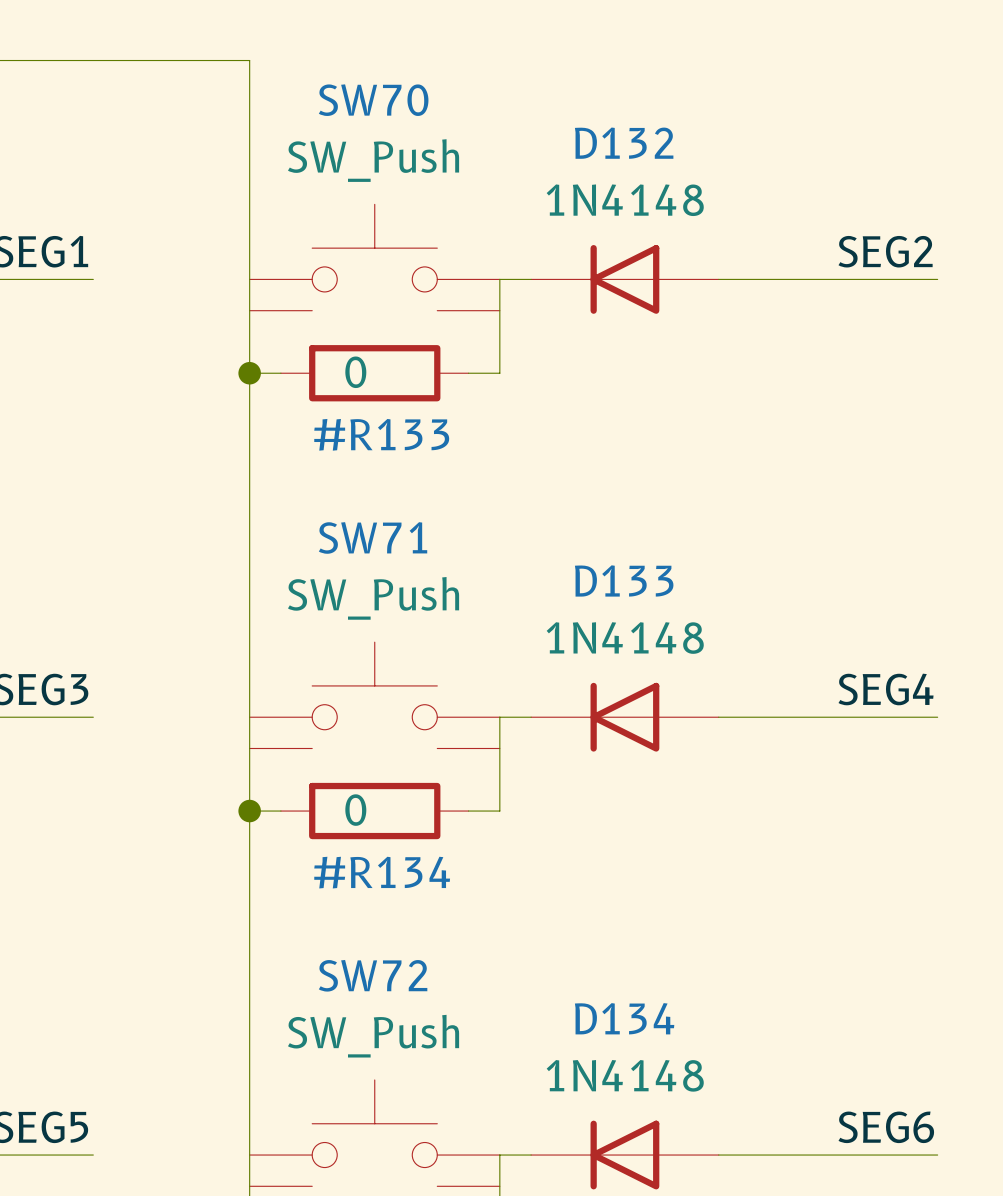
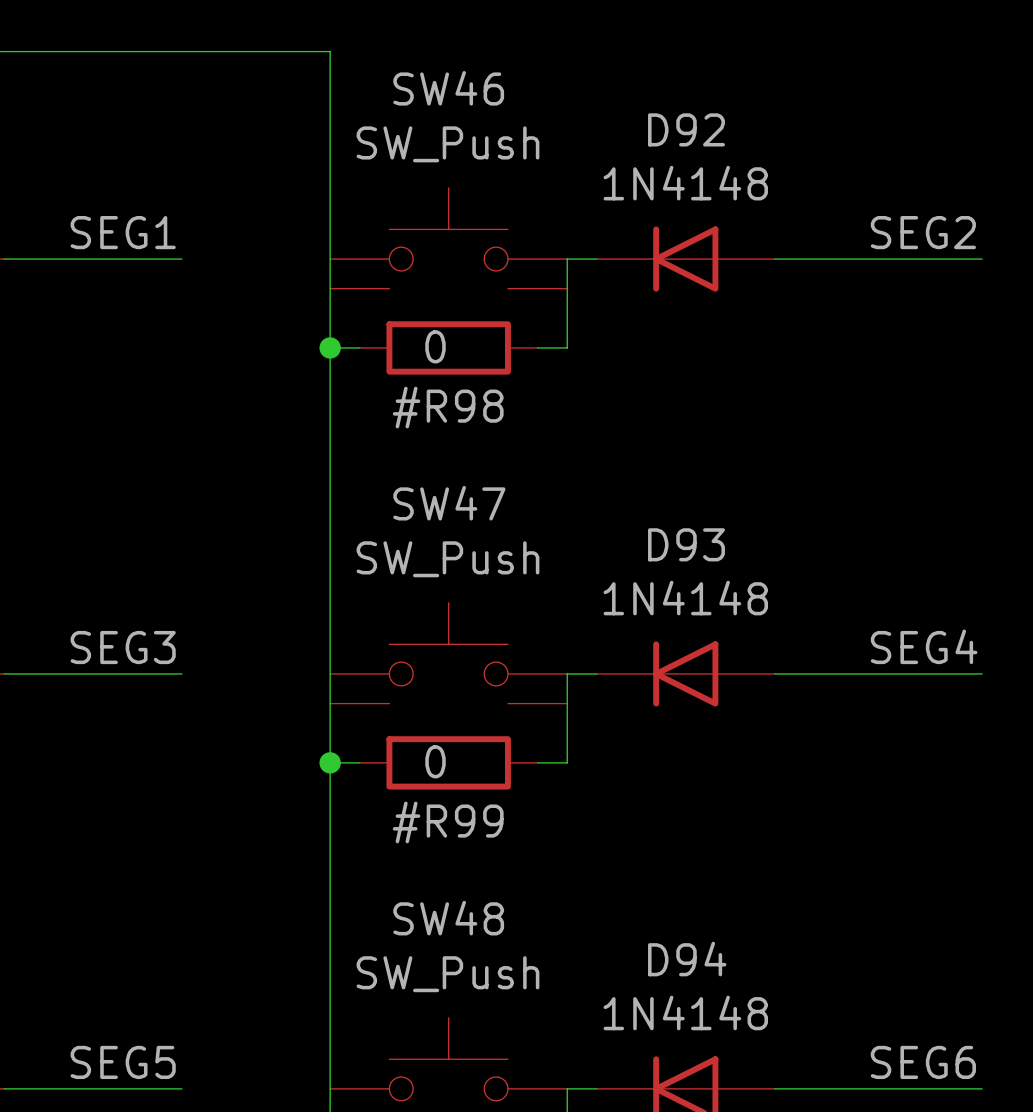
SW70 name: SW70 (373, 100) -> SW46 (448, 88)
D132 name: D132 (624, 143) -> D92 (686, 129)
#R133 name: #R133 (381, 434) -> #R98 (448, 407)
SW71 name: SW71 (373, 537) -> SW47 (449, 503)
D133 name: D133 (624, 580) -> D93 (686, 544)
#R134 name: #R134 (382, 872) -> #R99 (448, 822)
SW72 name: SW72 (373, 975) -> SW48 (448, 918)
D134 name: D134 (624, 1018) -> D94 (687, 959)

